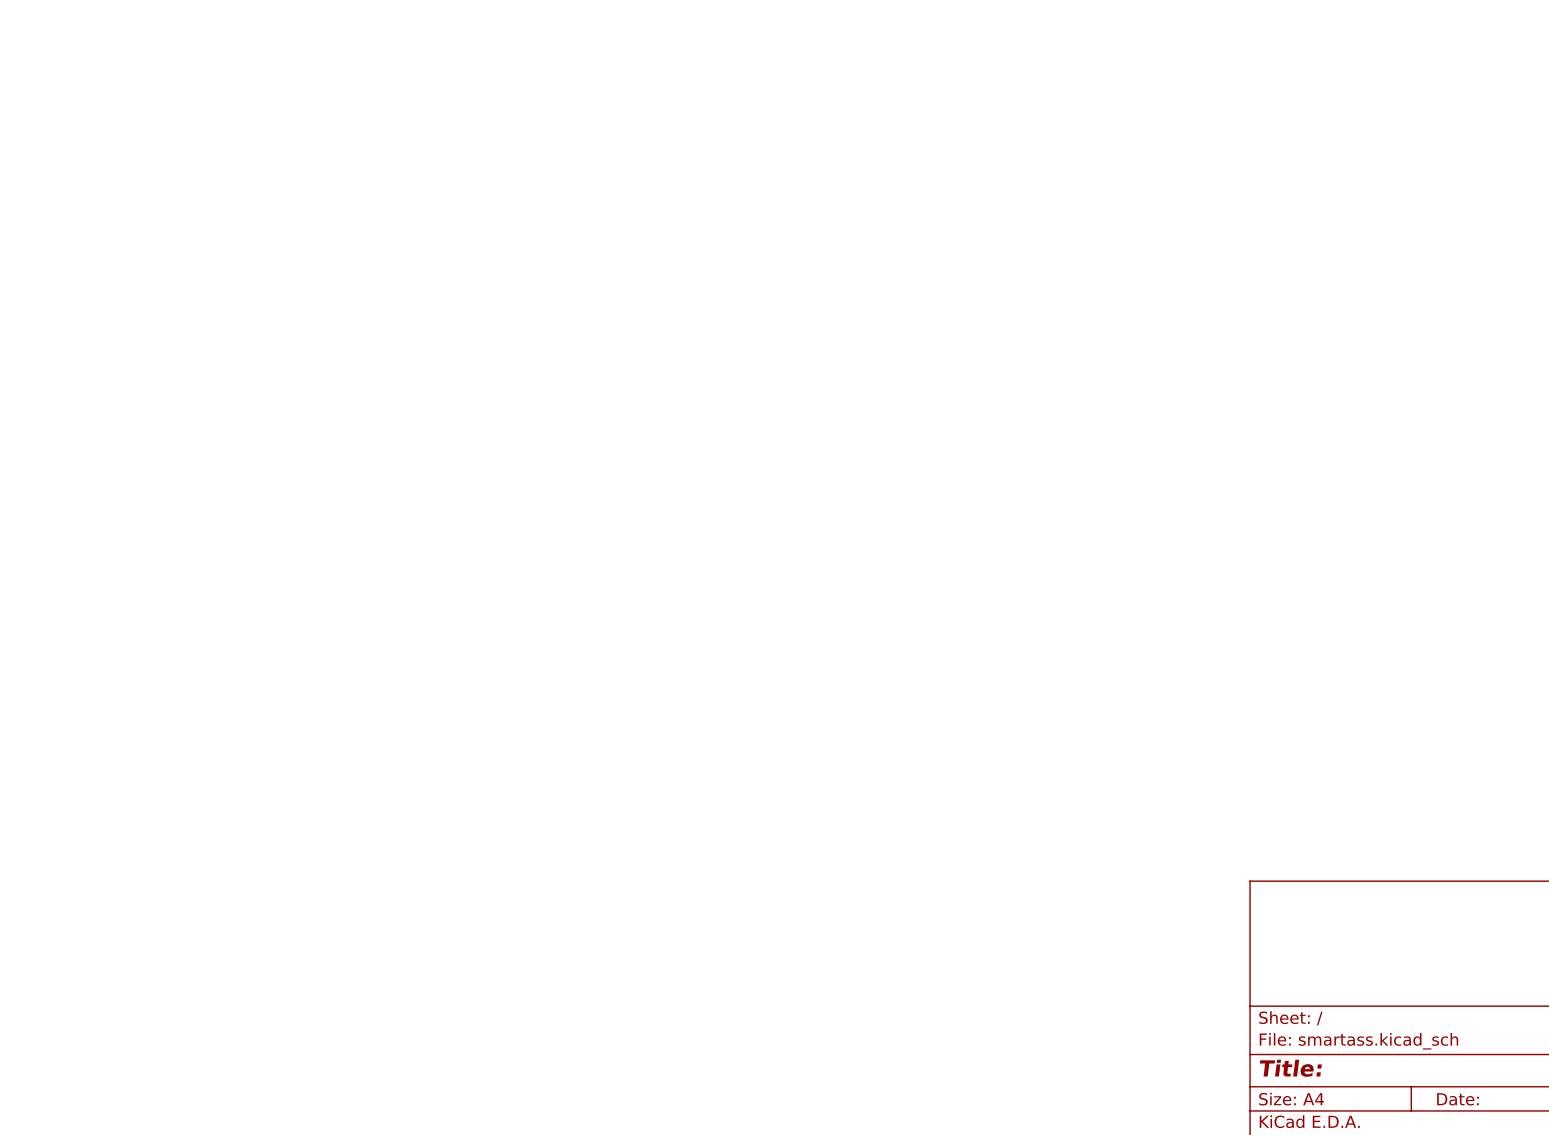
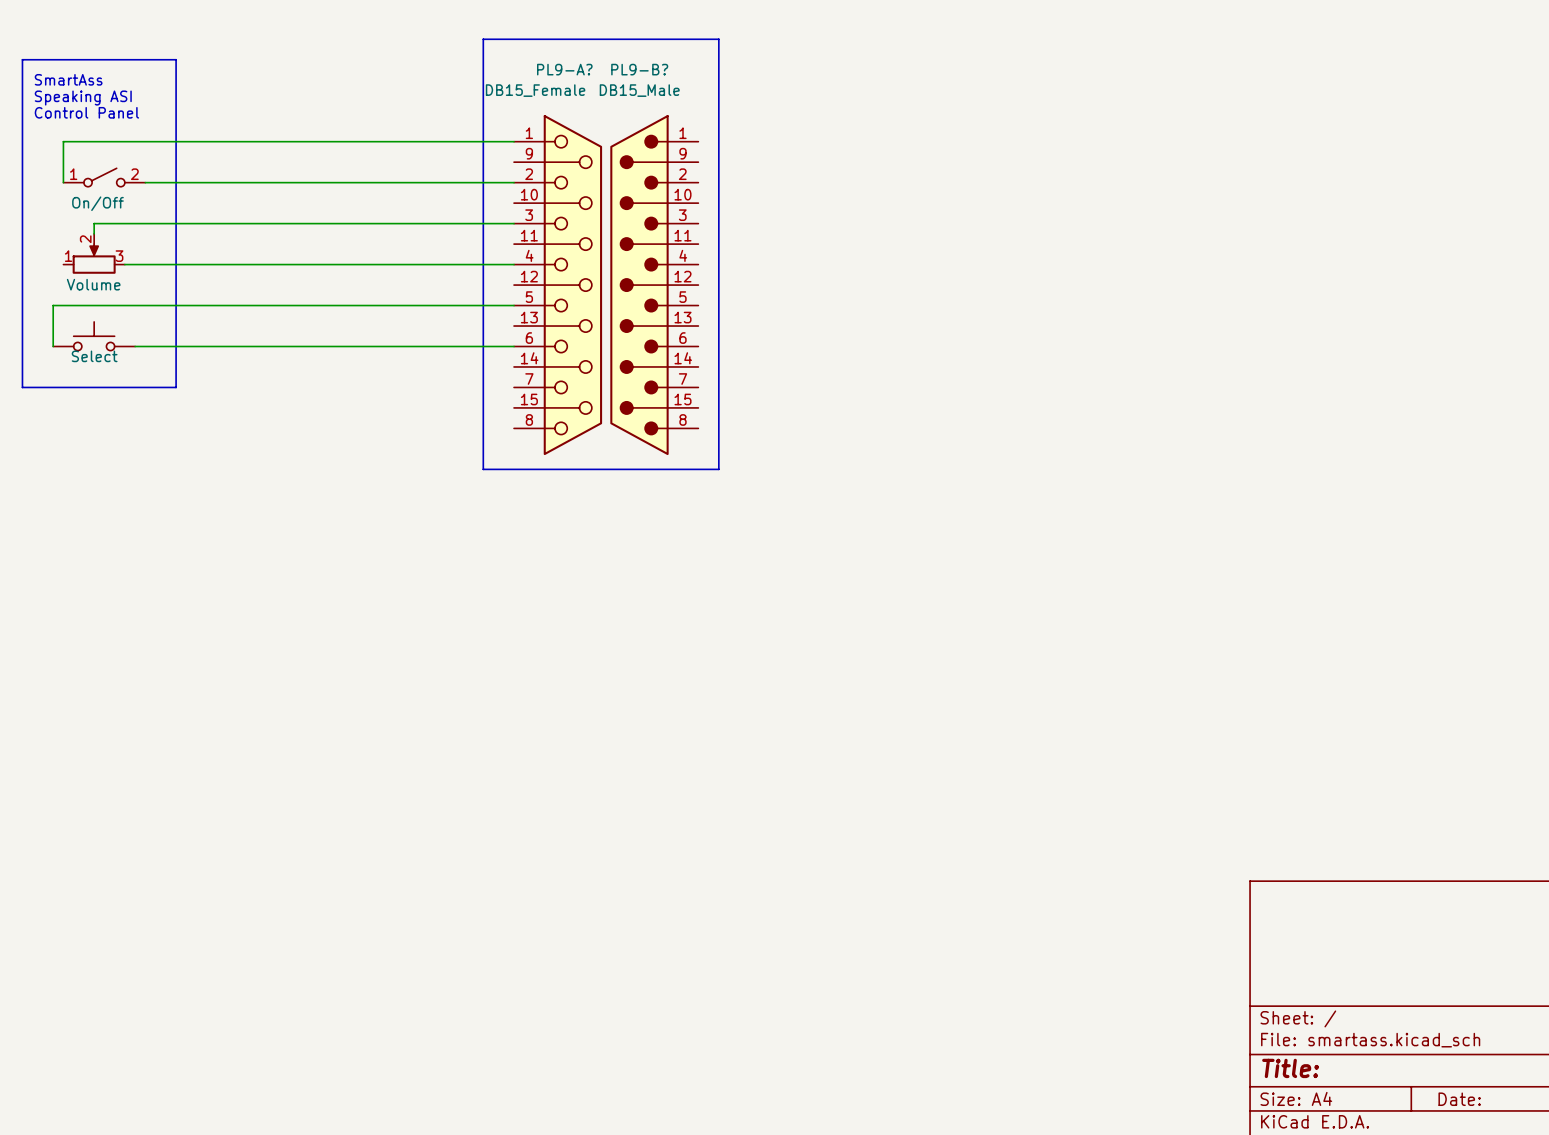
line: none -> (483, 39) (483, 469) (718, 469) (718, 39) (483, 39)
line: none -> (22, 59) (22, 387) (176, 387) (176, 59) (22, 59)
text: none -> SmartAss (68, 79)
text: none -> Speaking ASI (83, 98)
text: none -> Control Panel (86, 112)
wire: none -> (514, 141) (63, 141) (63, 182)
part: none -> On/Off (104, 177)
wire: none -> (145, 182) (514, 182)
wire: none -> (514, 223) (94, 223) (94, 233)
part: none -> Volume (94, 253)
wire: none -> (124, 264) (514, 264)
PL9-A?: none -> DB15_Female (558, 285)
PL9-B?: none -> DB15_Male (654, 285)
wire: none -> (514, 305) (53, 305) (53, 346)
part: none -> Select (94, 336)
wire: none -> (135, 346) (514, 346)

